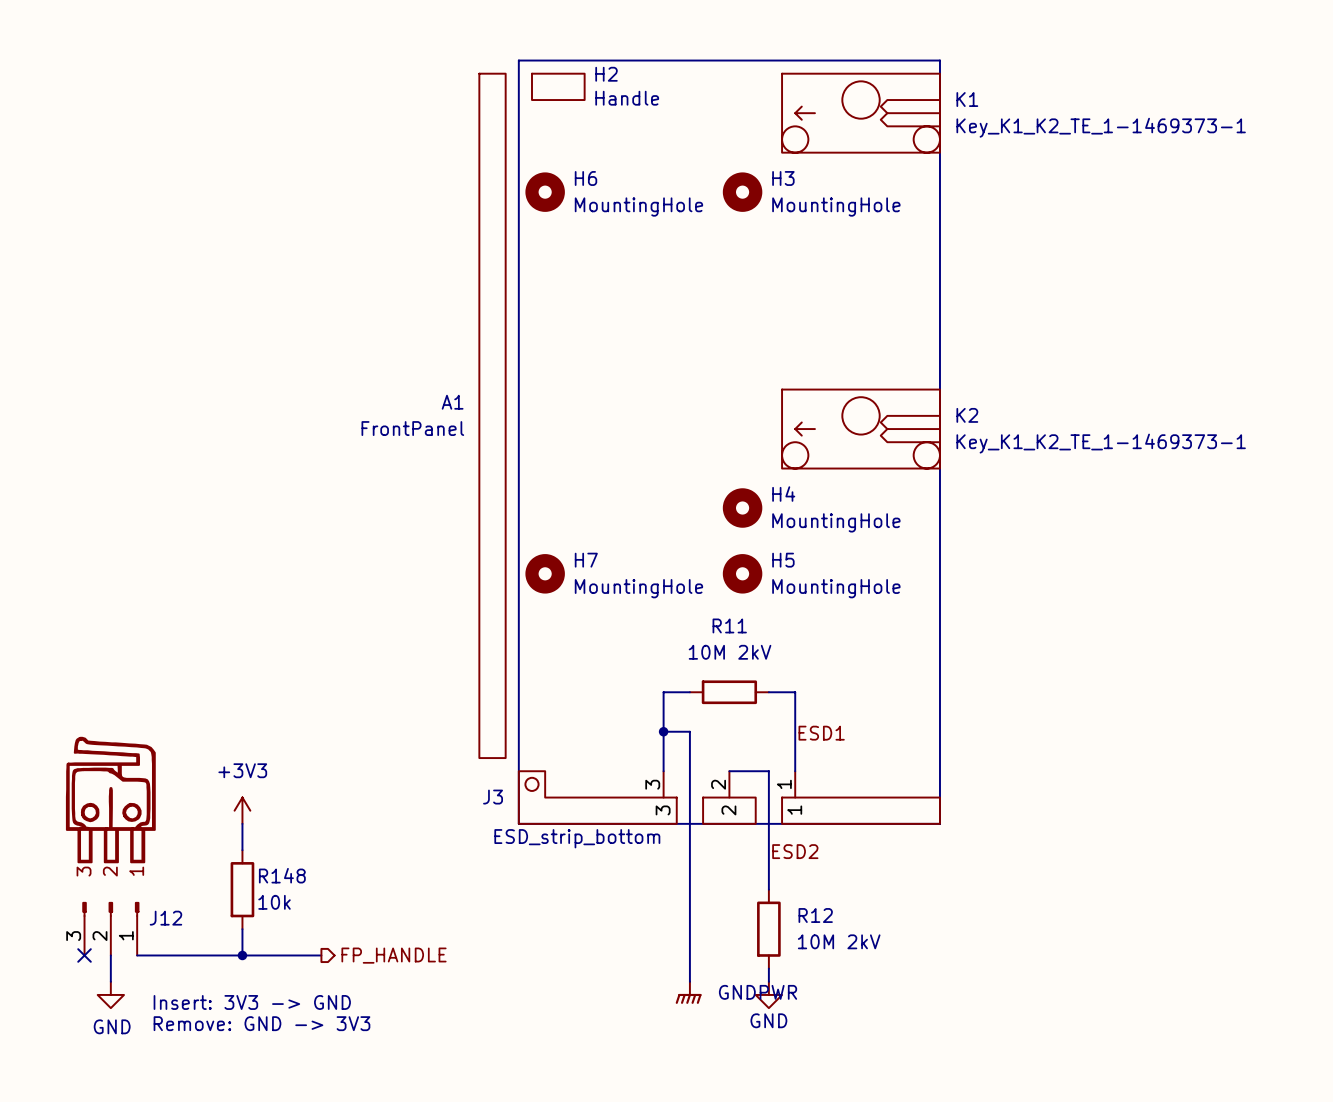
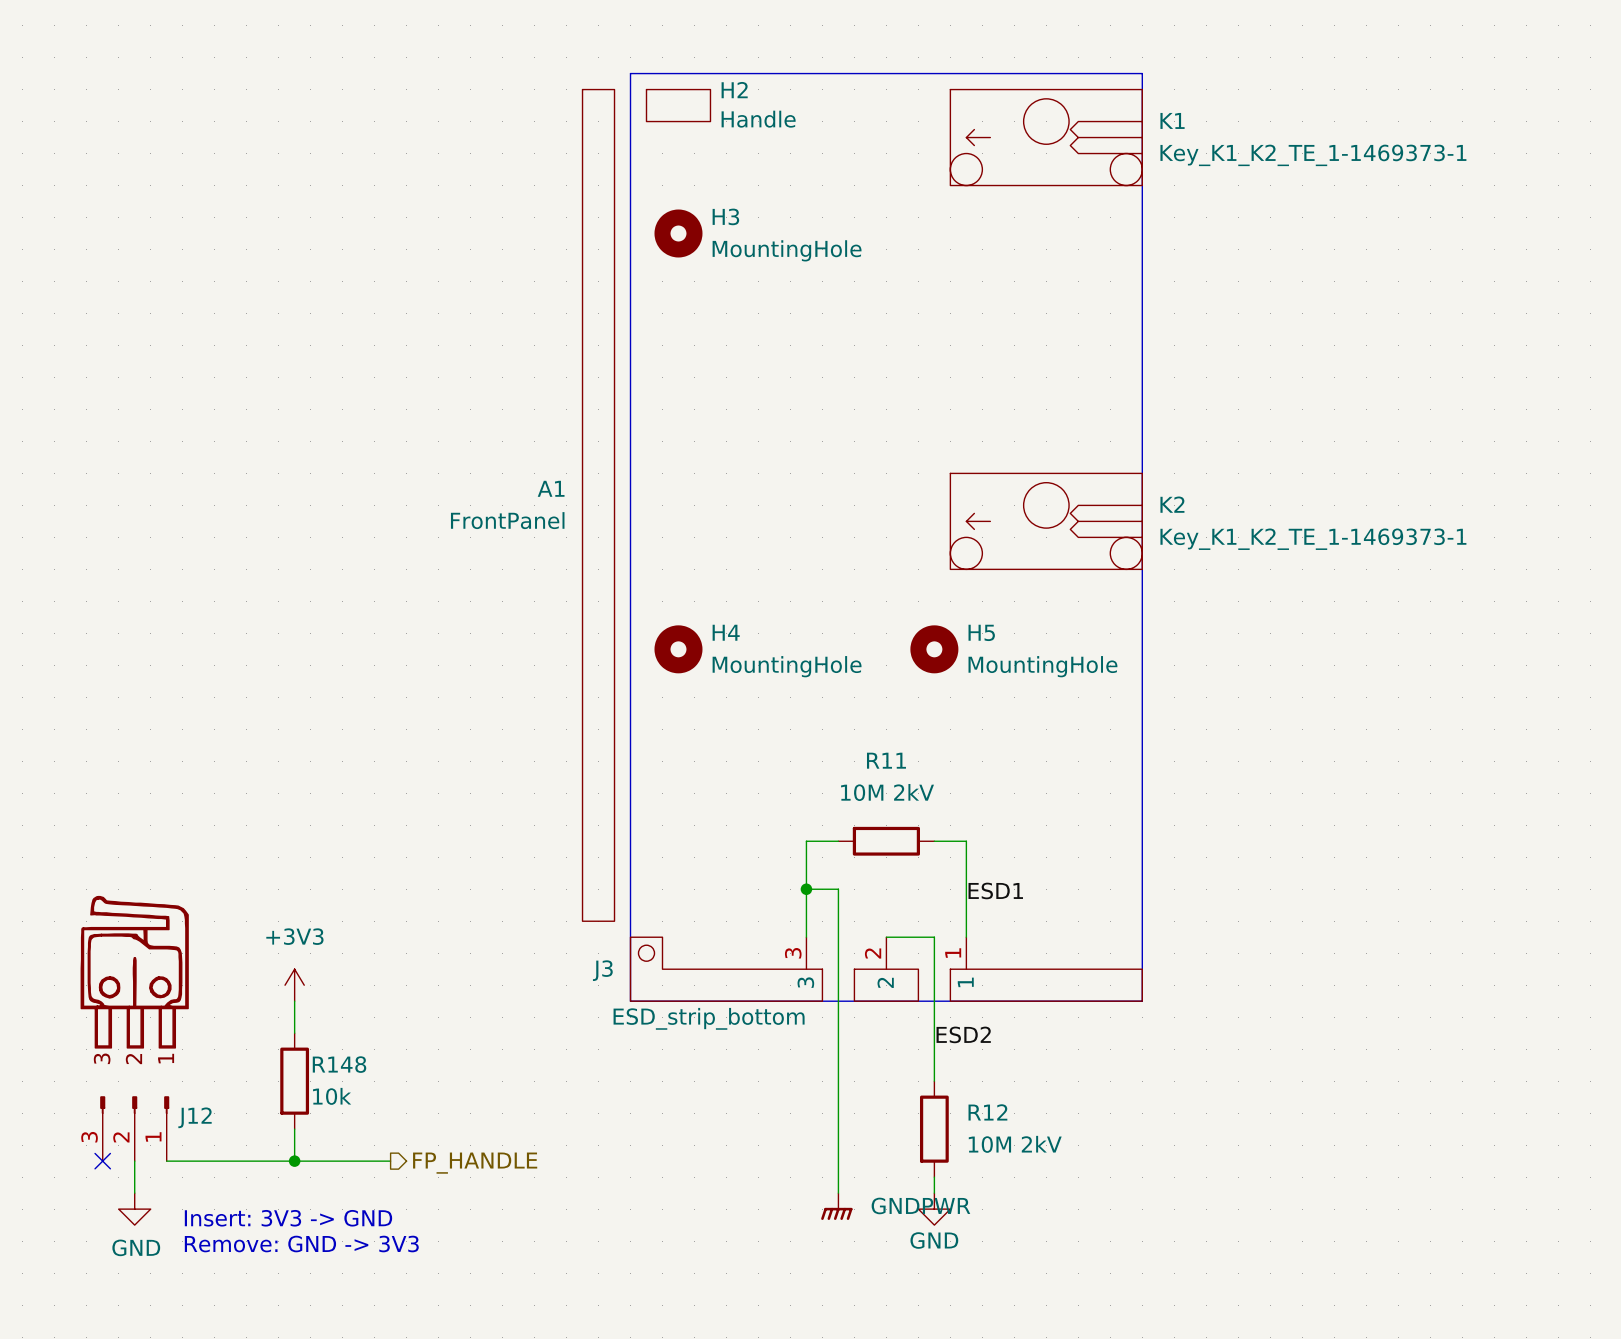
H6: MountingHole (545, 192) -> none
H3 position: (742, 192) -> (678, 233)
H4 position: (742, 508) -> (678, 649)
H7: MountingHole (545, 573) -> none
H5 position: (742, 573) -> (934, 649)

